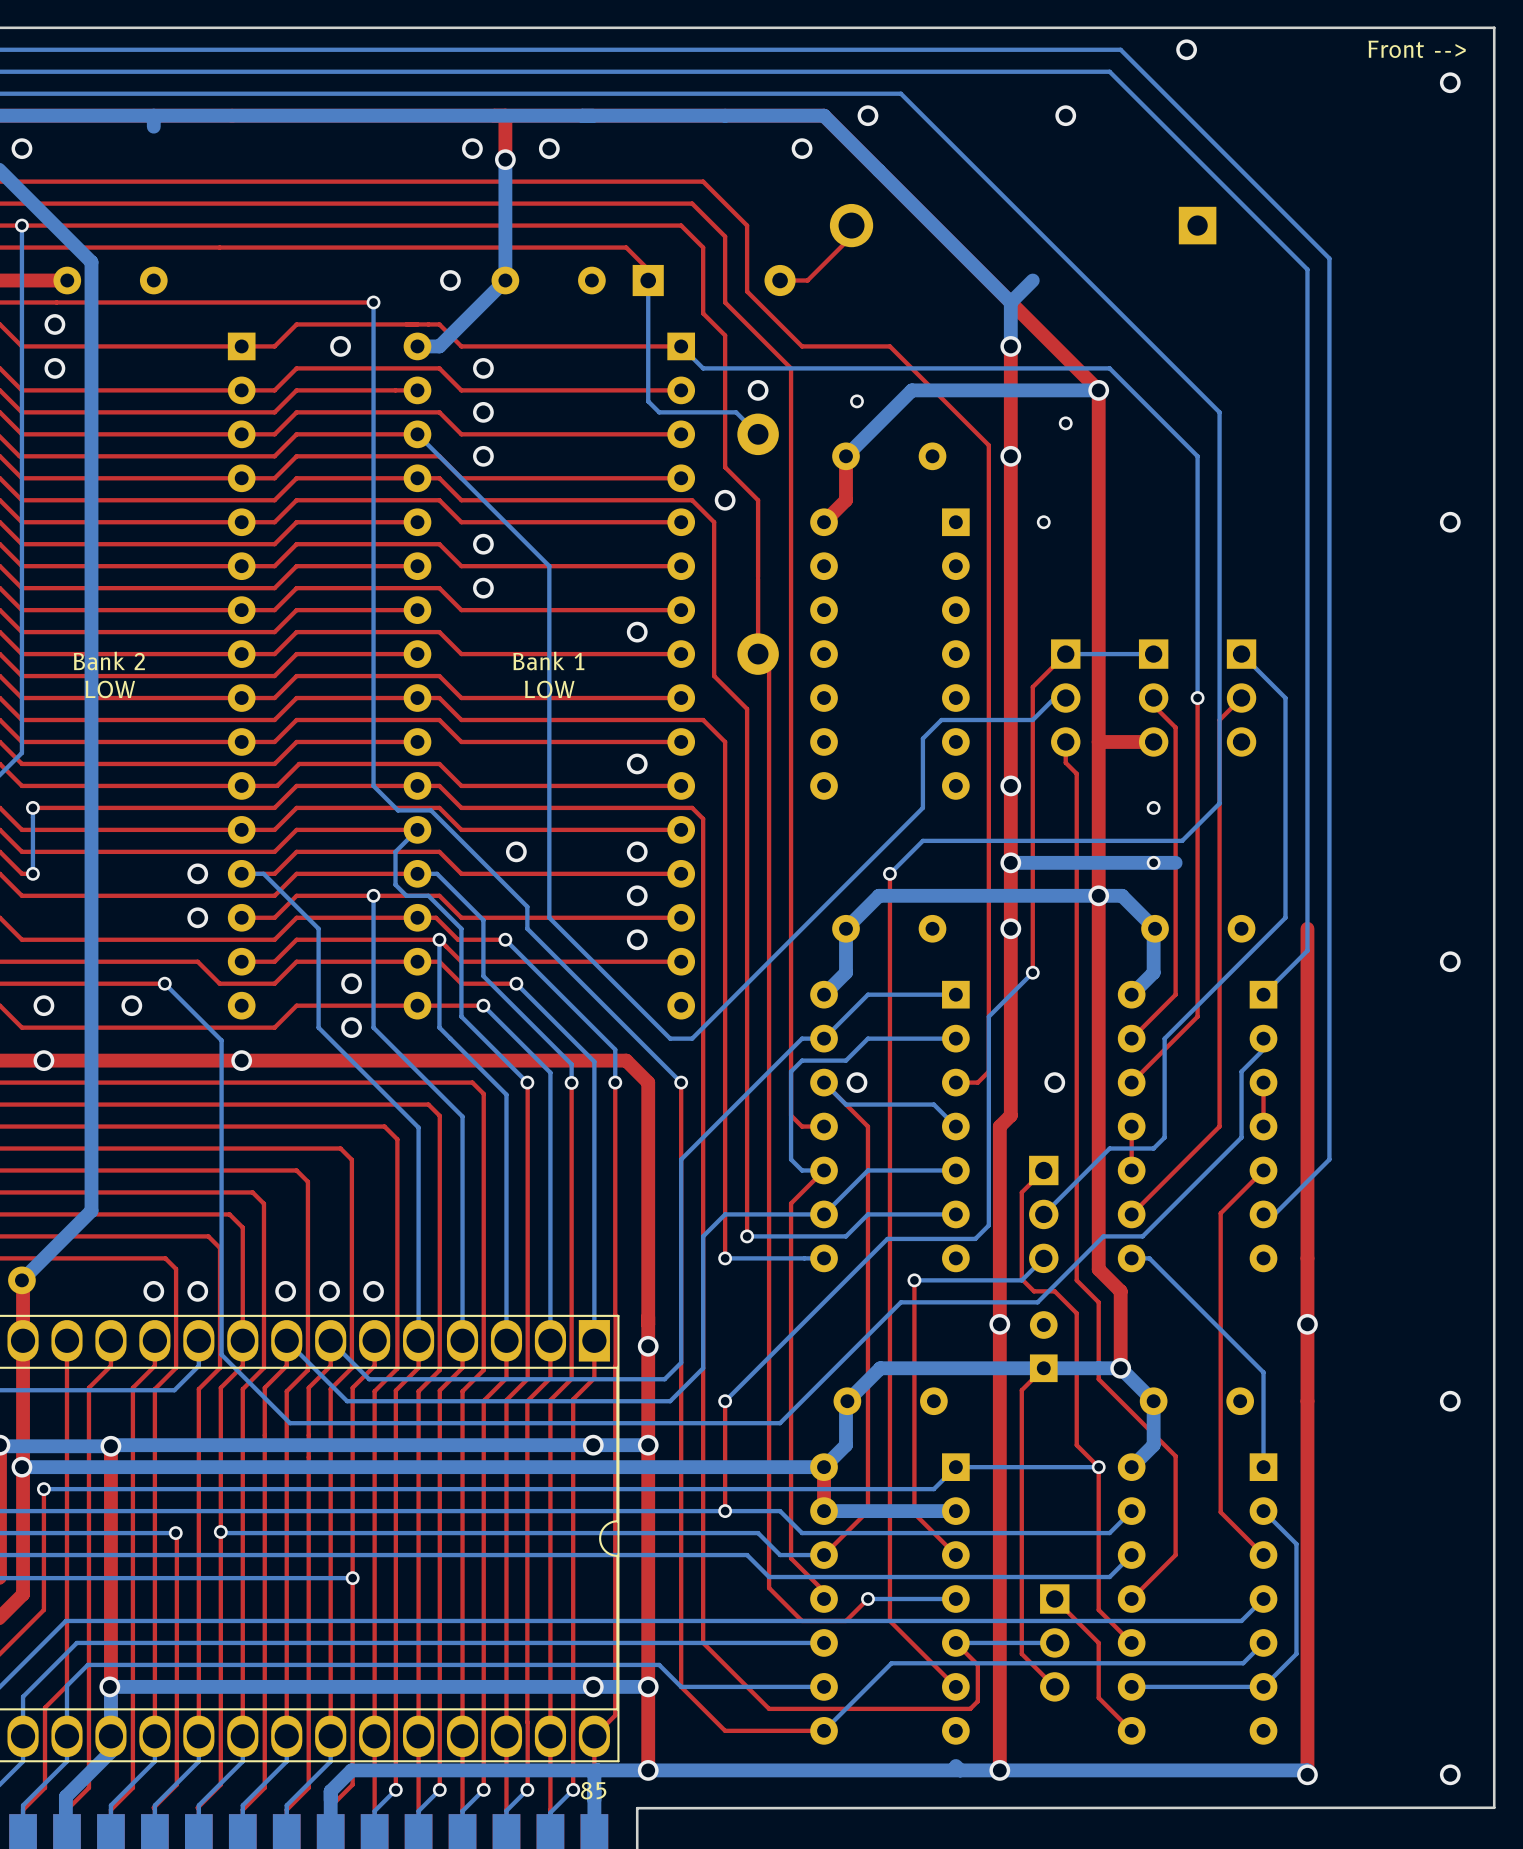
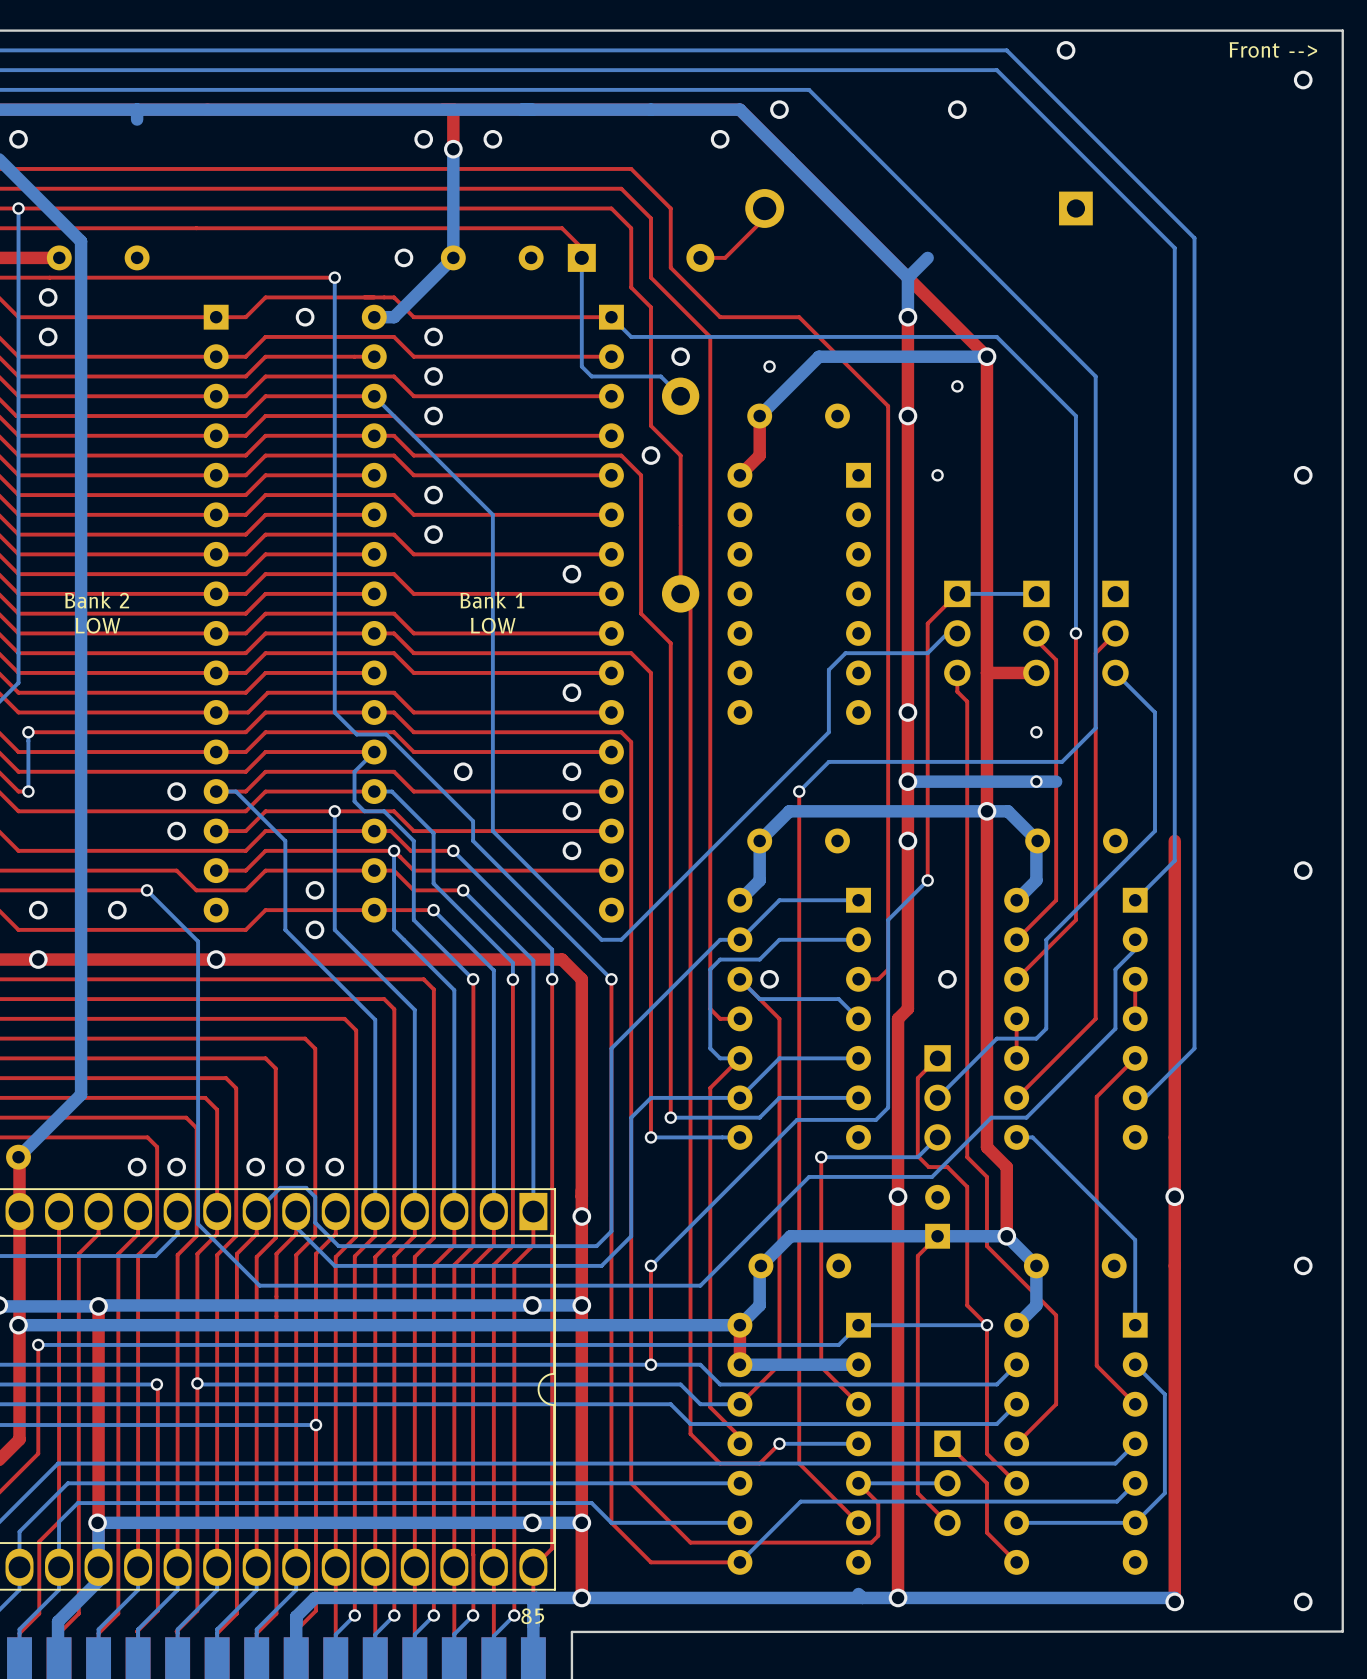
bottom track: (1241, 654) (1285, 698) (1285, 785) -> (1115, 672) (1154, 712)
bottom track: (286, 1340) (347, 1401) (373, 1401) -> (256, 1211) (280, 1187) (306, 1187) (315, 1197) (315, 1222) (338, 1246)
bottom track: (330, 1340) (369, 1379) (377, 1379) -> none
bottom track: none -> (296, 1227) (334, 1265)

